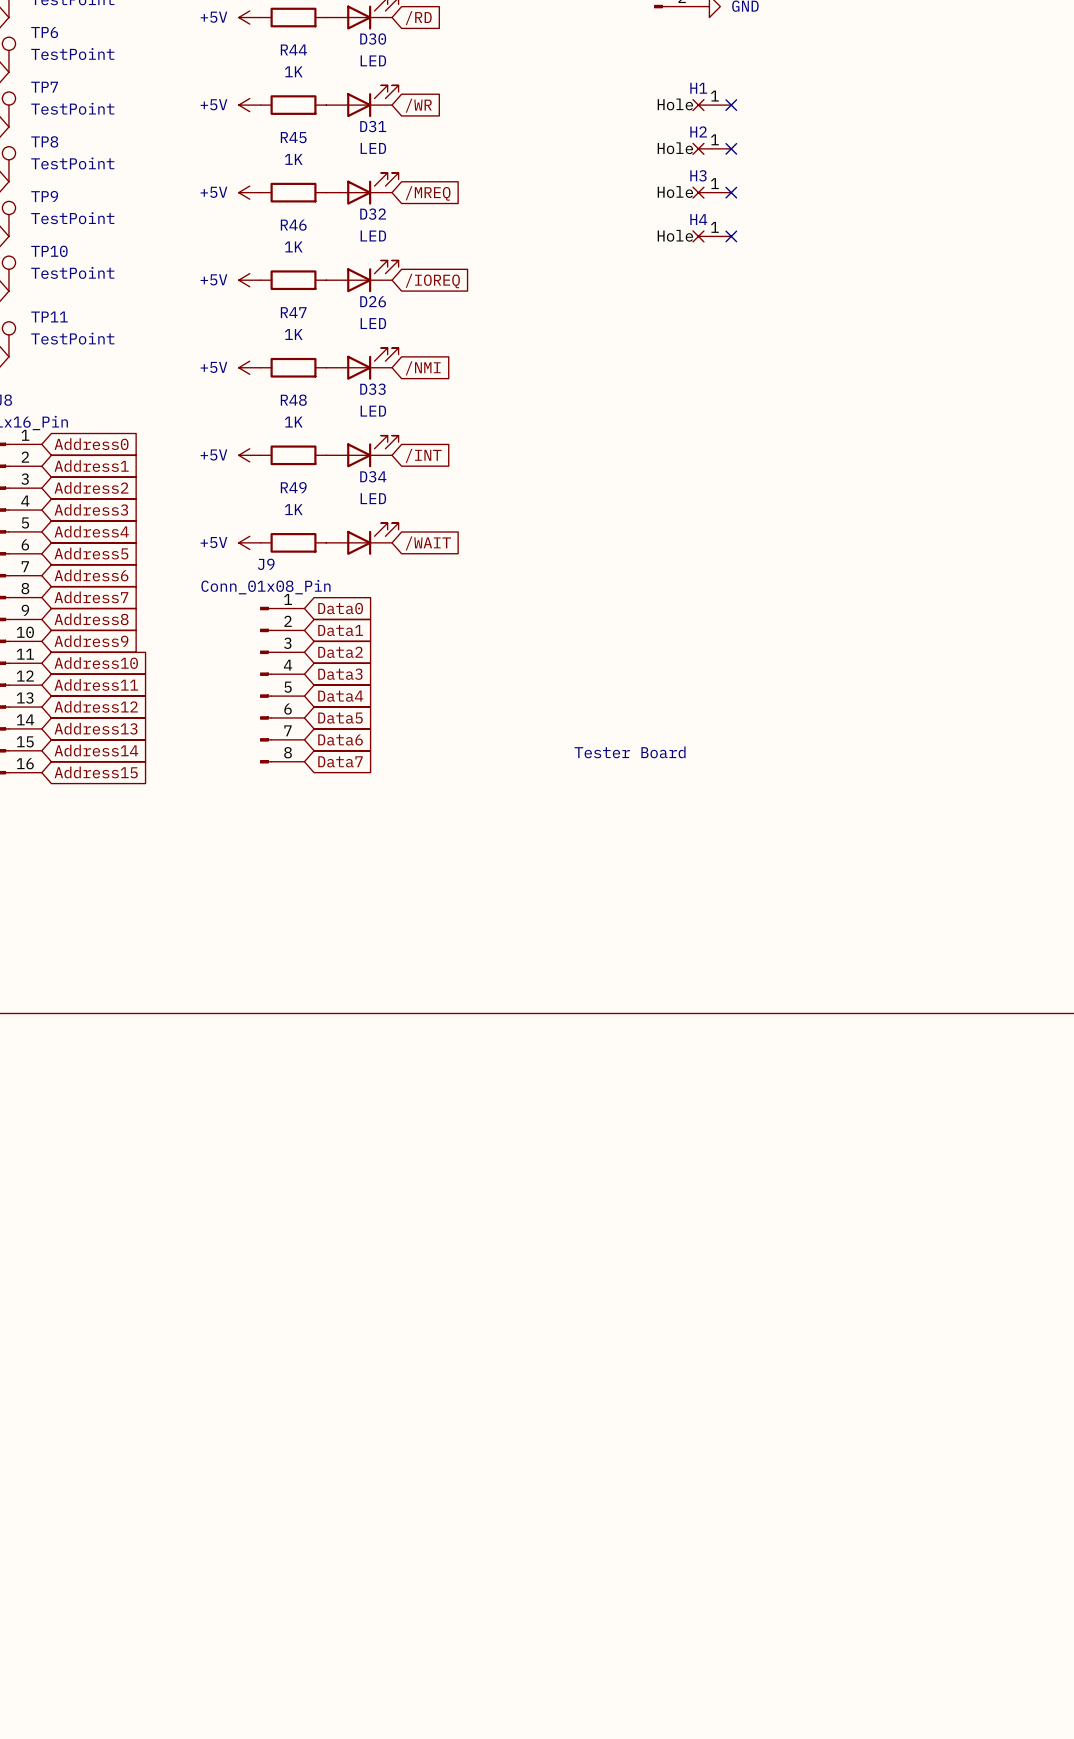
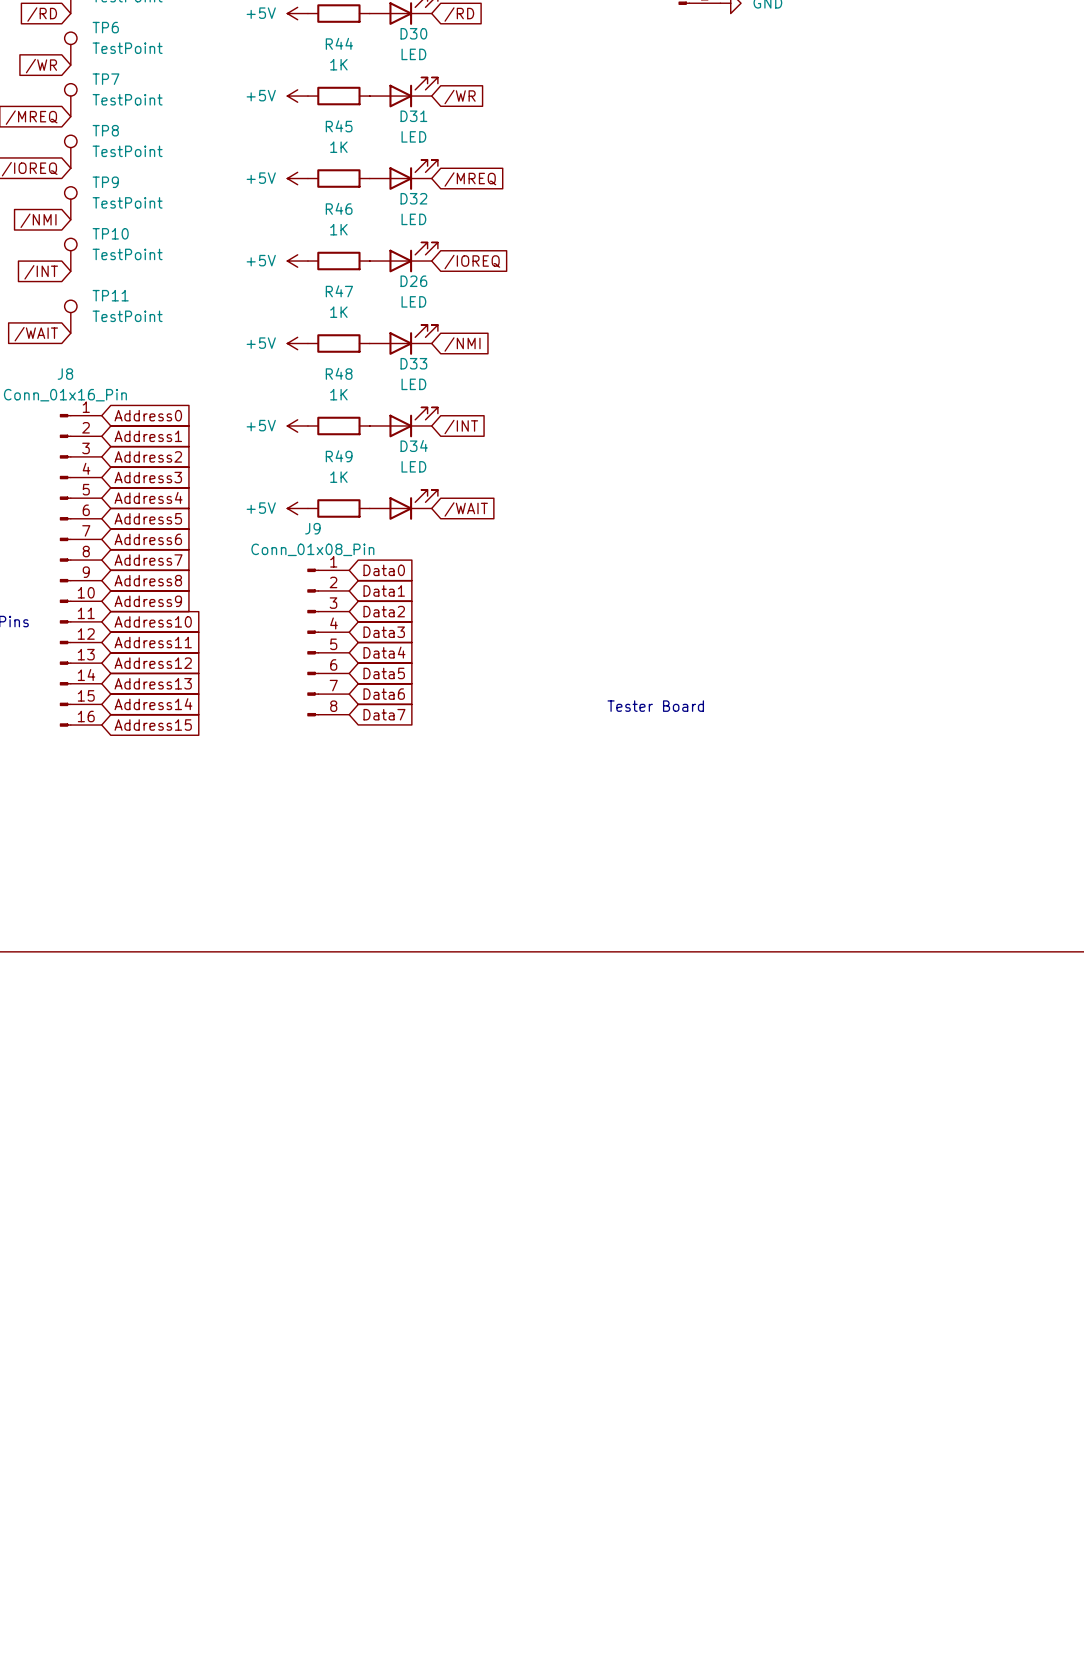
H1: (712, 105) -> none
no-connect mark: (731, 105) -> none
H2: (712, 148) -> none
no-connect mark: (731, 148) -> none
H3: (712, 192) -> none
no-connect mark: (731, 192) -> none
H4: (712, 236) -> none
no-connect mark: (731, 236) -> none

